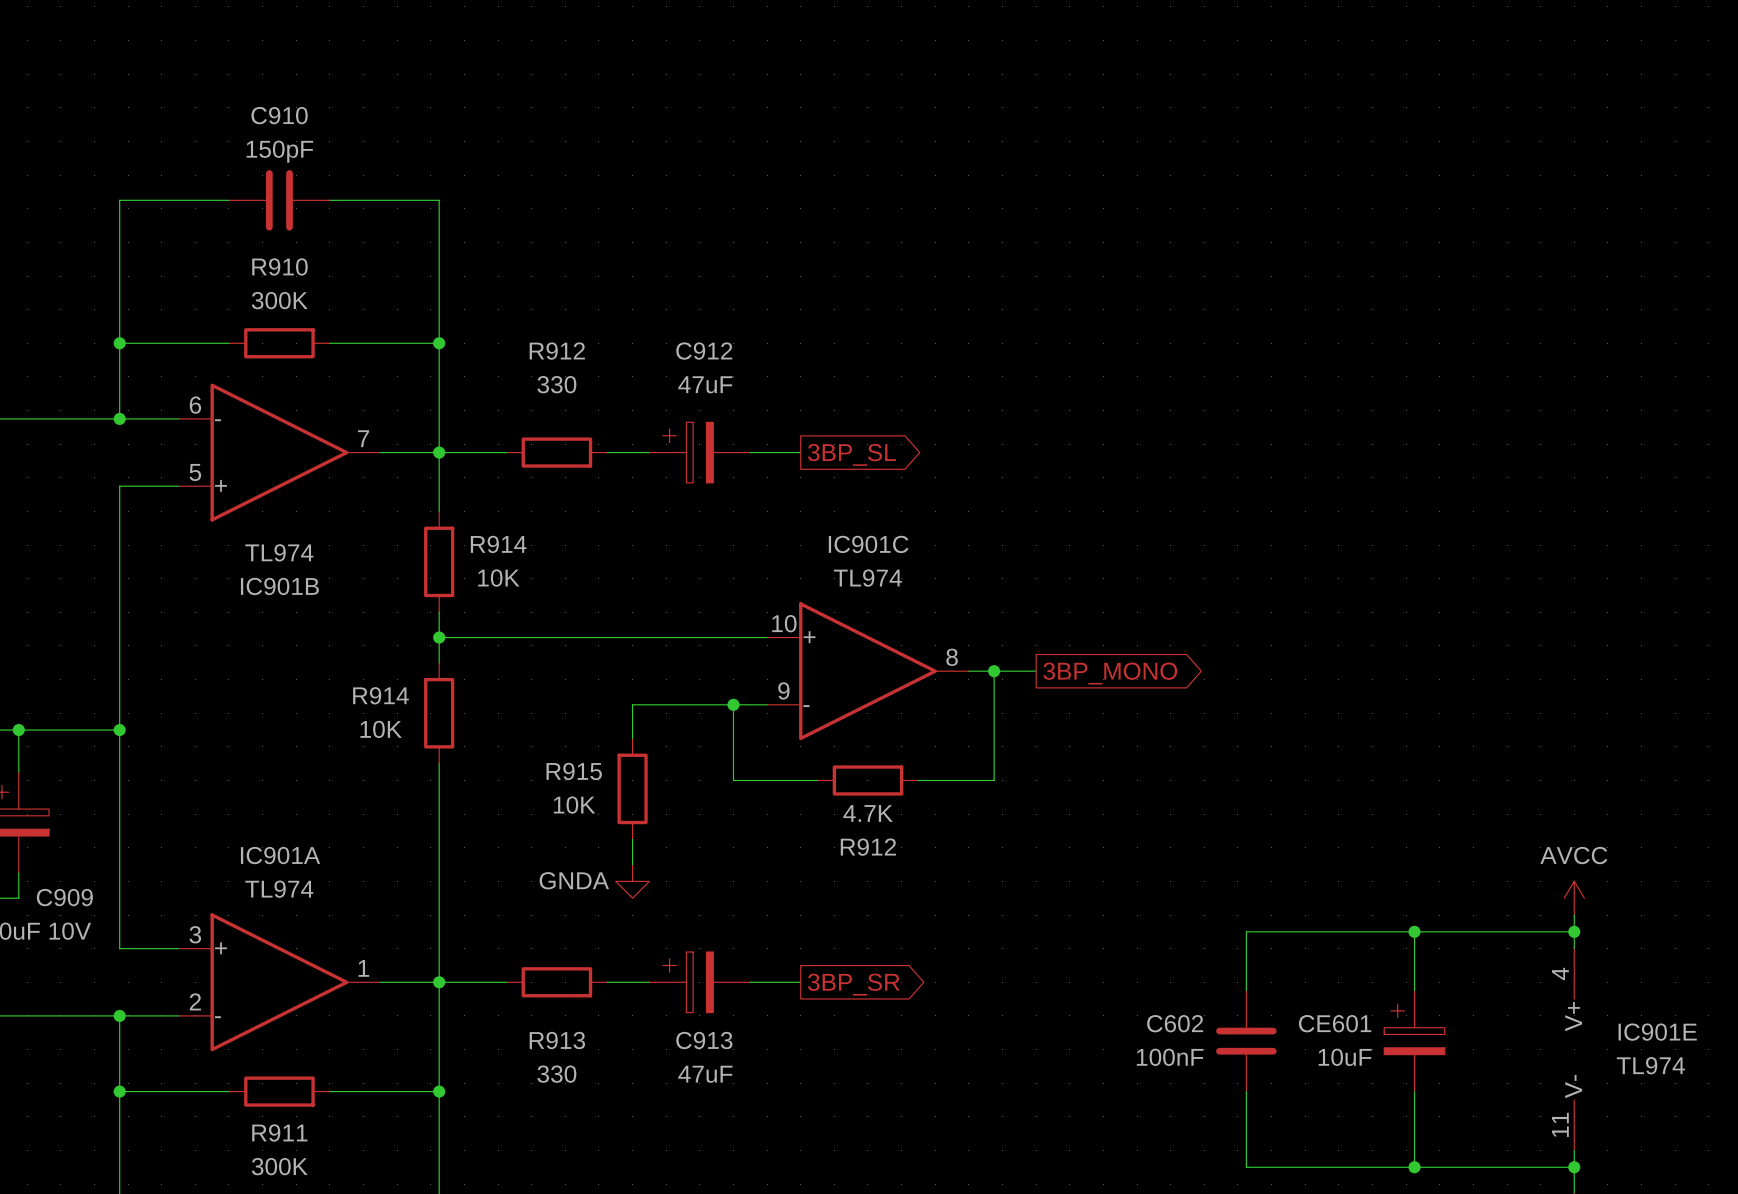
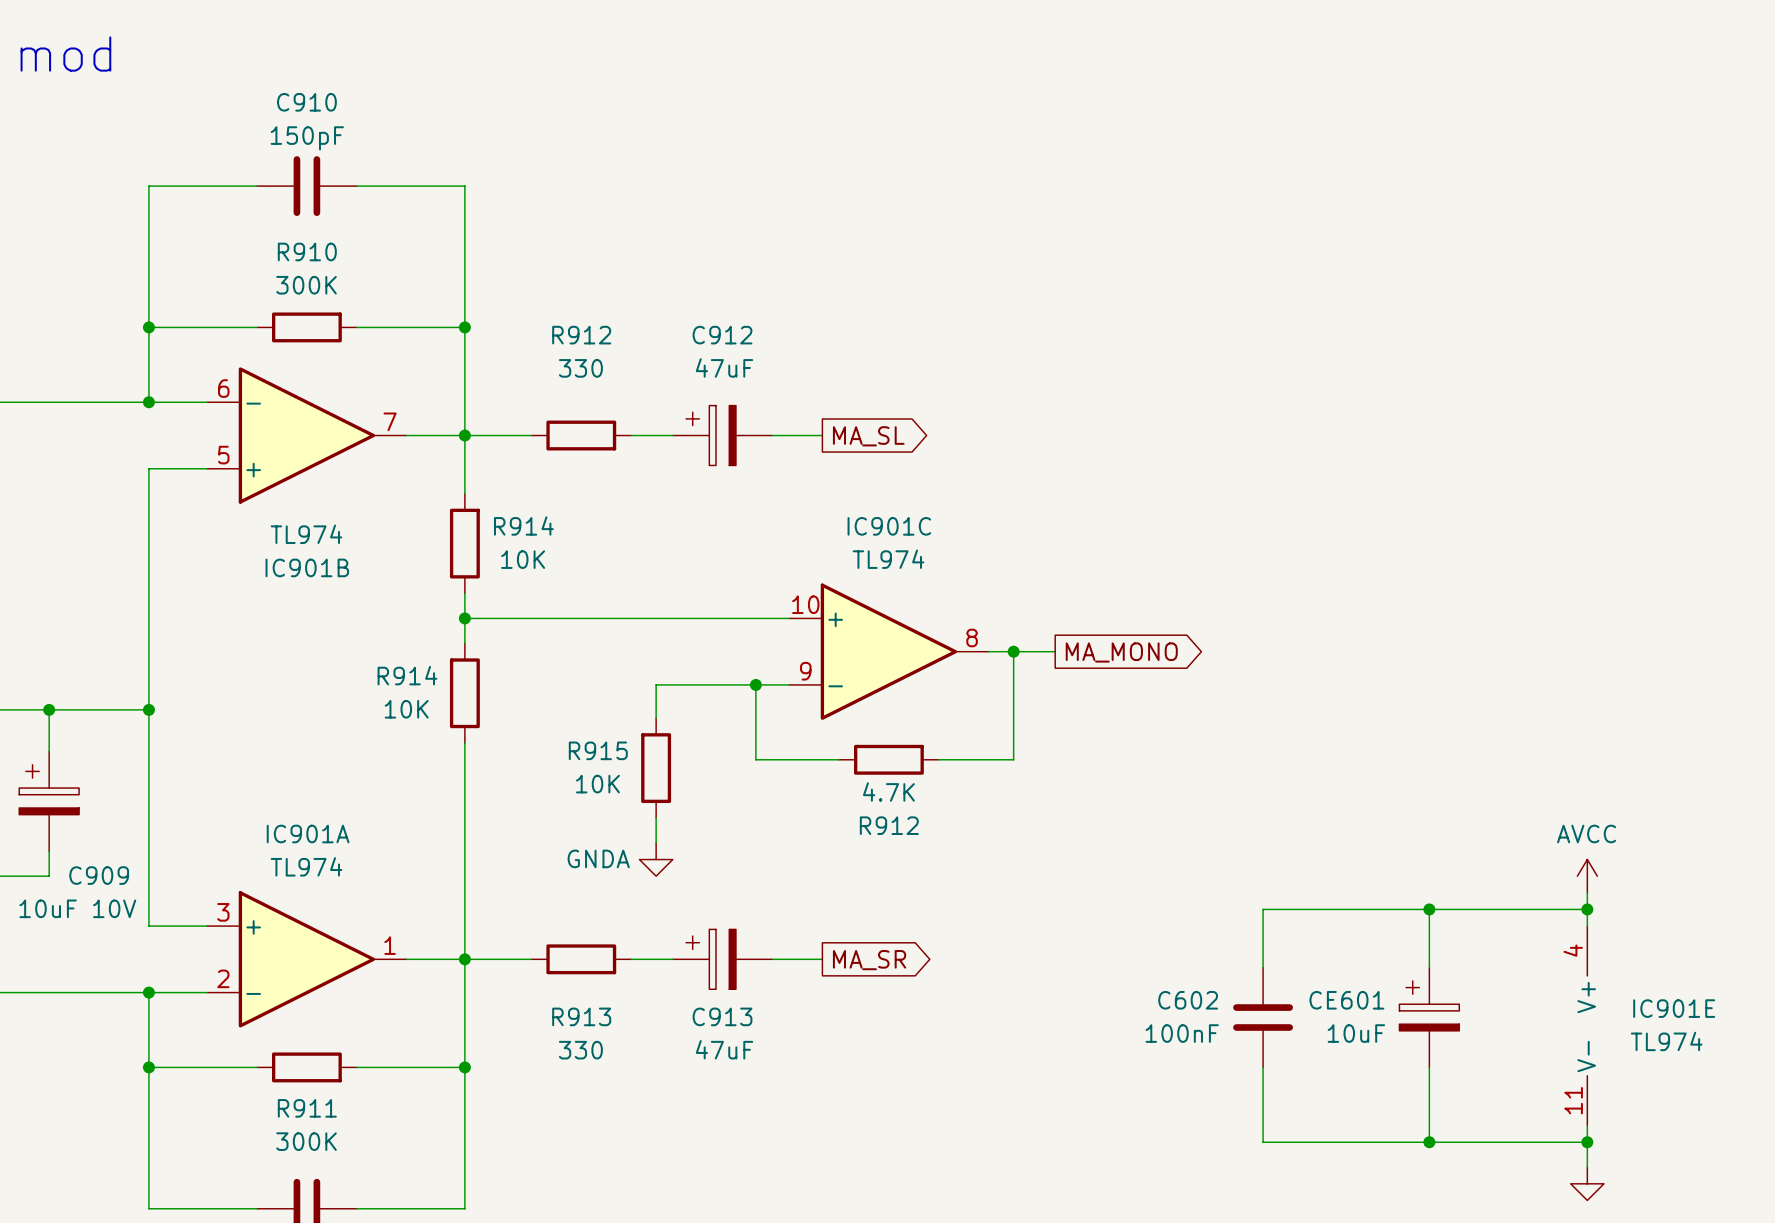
global label: 3BP_SL (851, 454) -> MA_SL (868, 436)
global label: 3BP_MONO (1110, 673) -> MA_MONO (1121, 652)
global label: 3BP_SR (853, 984) -> MA_SR (869, 960)

